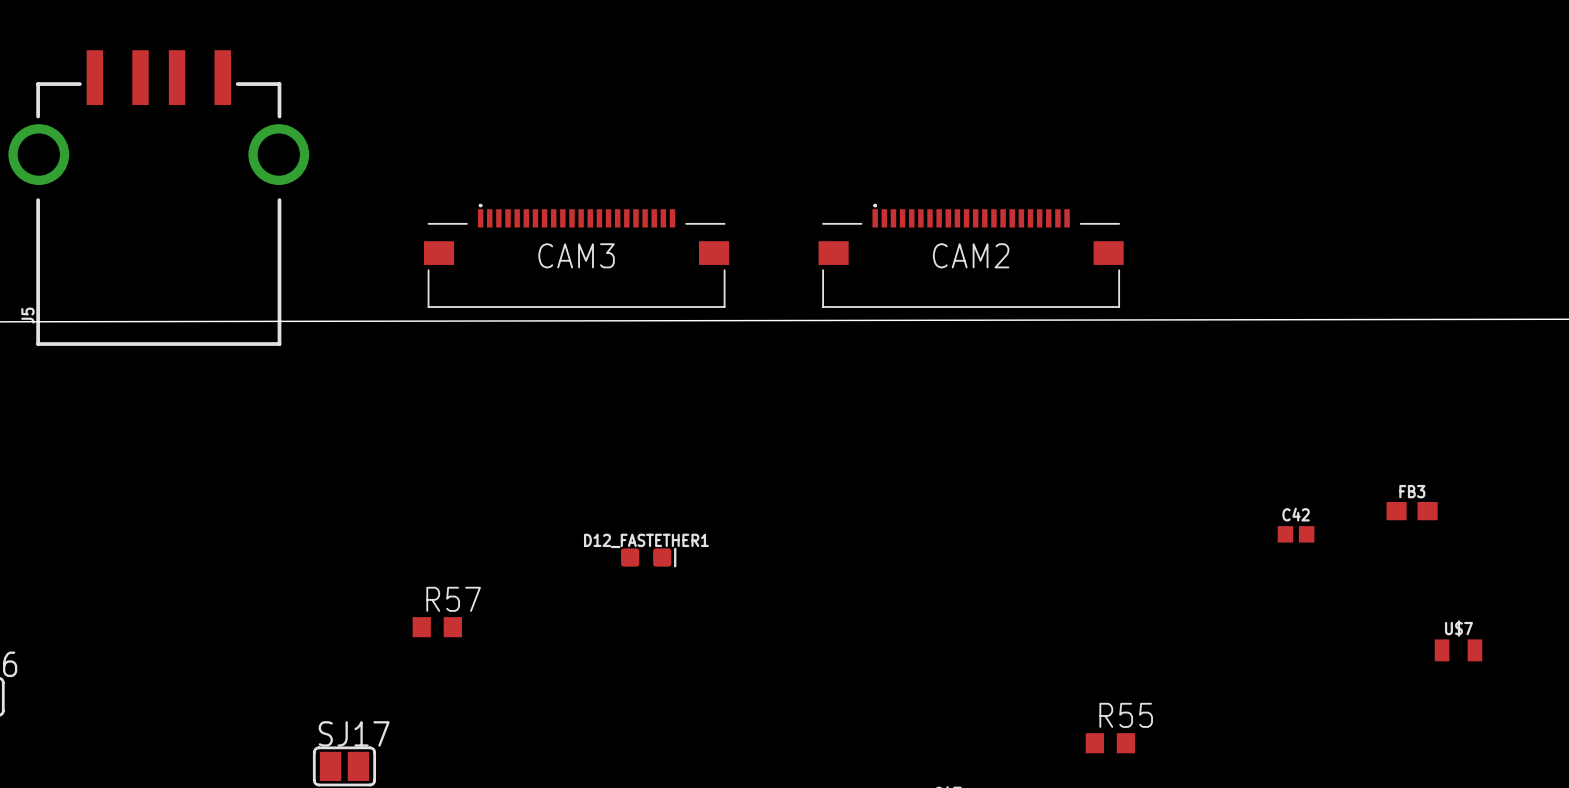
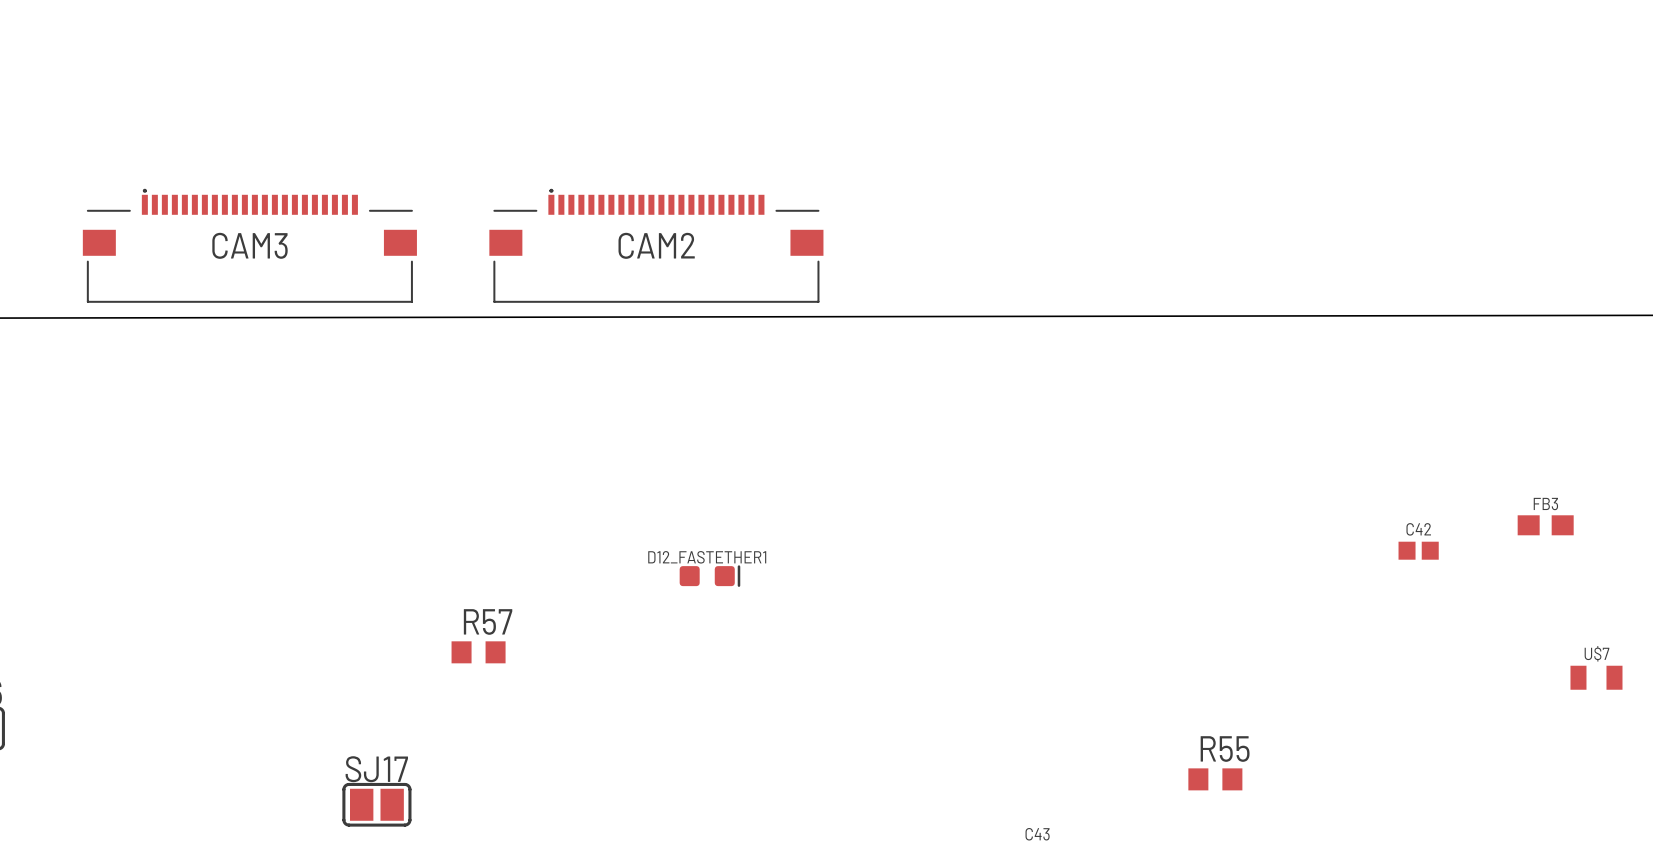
J5: (158, 198) -> none
CAM3 position: (576, 255) -> (249, 245)
CAM2 position: (971, 255) -> (656, 245)

